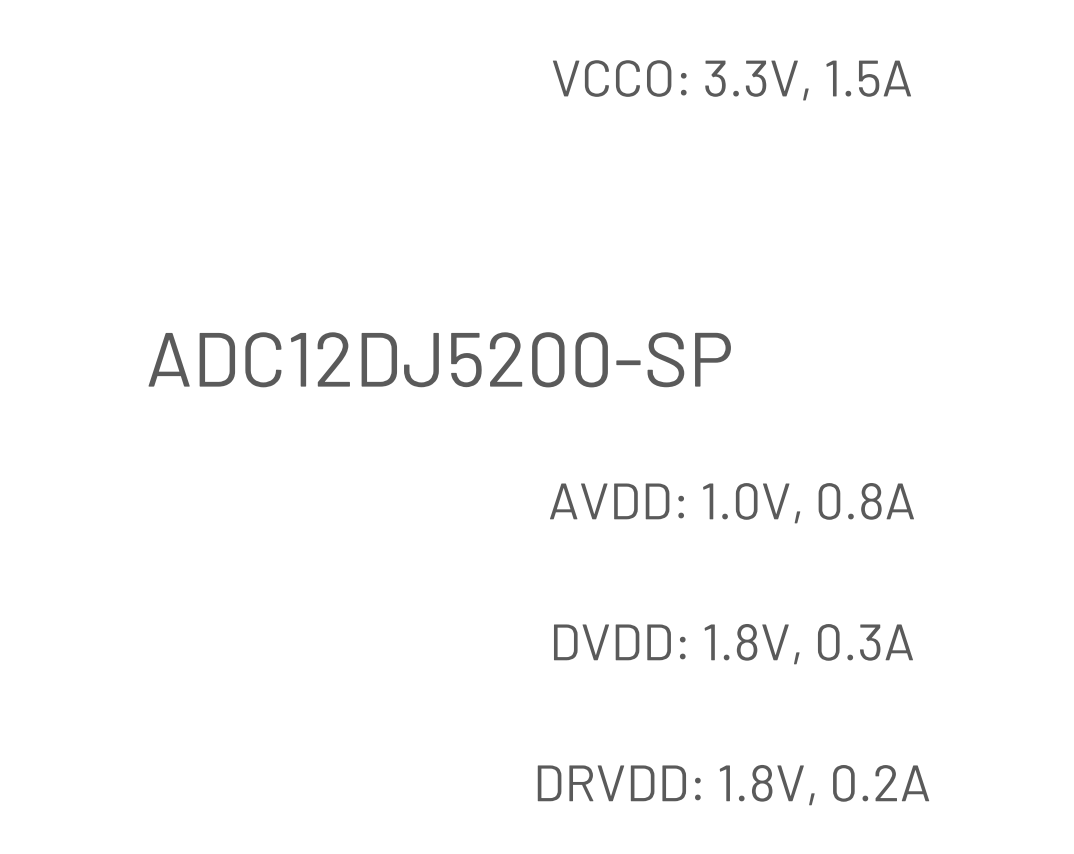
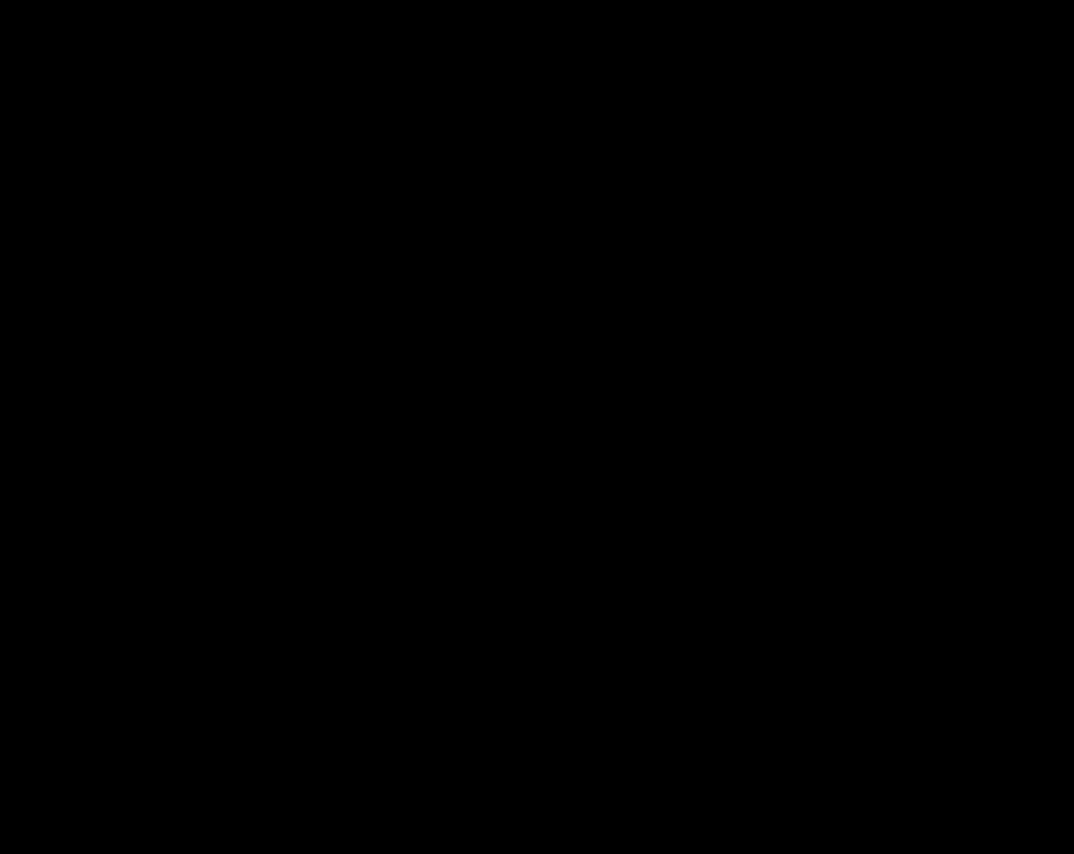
text: VCCO: 3.3V, 1.5A (731, 80) -> none
text: ADC12DJ5200-SP (439, 359) -> none
text: AVDD: 1.0V, 0.8A (731, 503) -> none
text: DVDD: 1.8V, 0.3A (733, 644) -> none
text: DRVDD: 1.8V, 0.2A (733, 785) -> none

